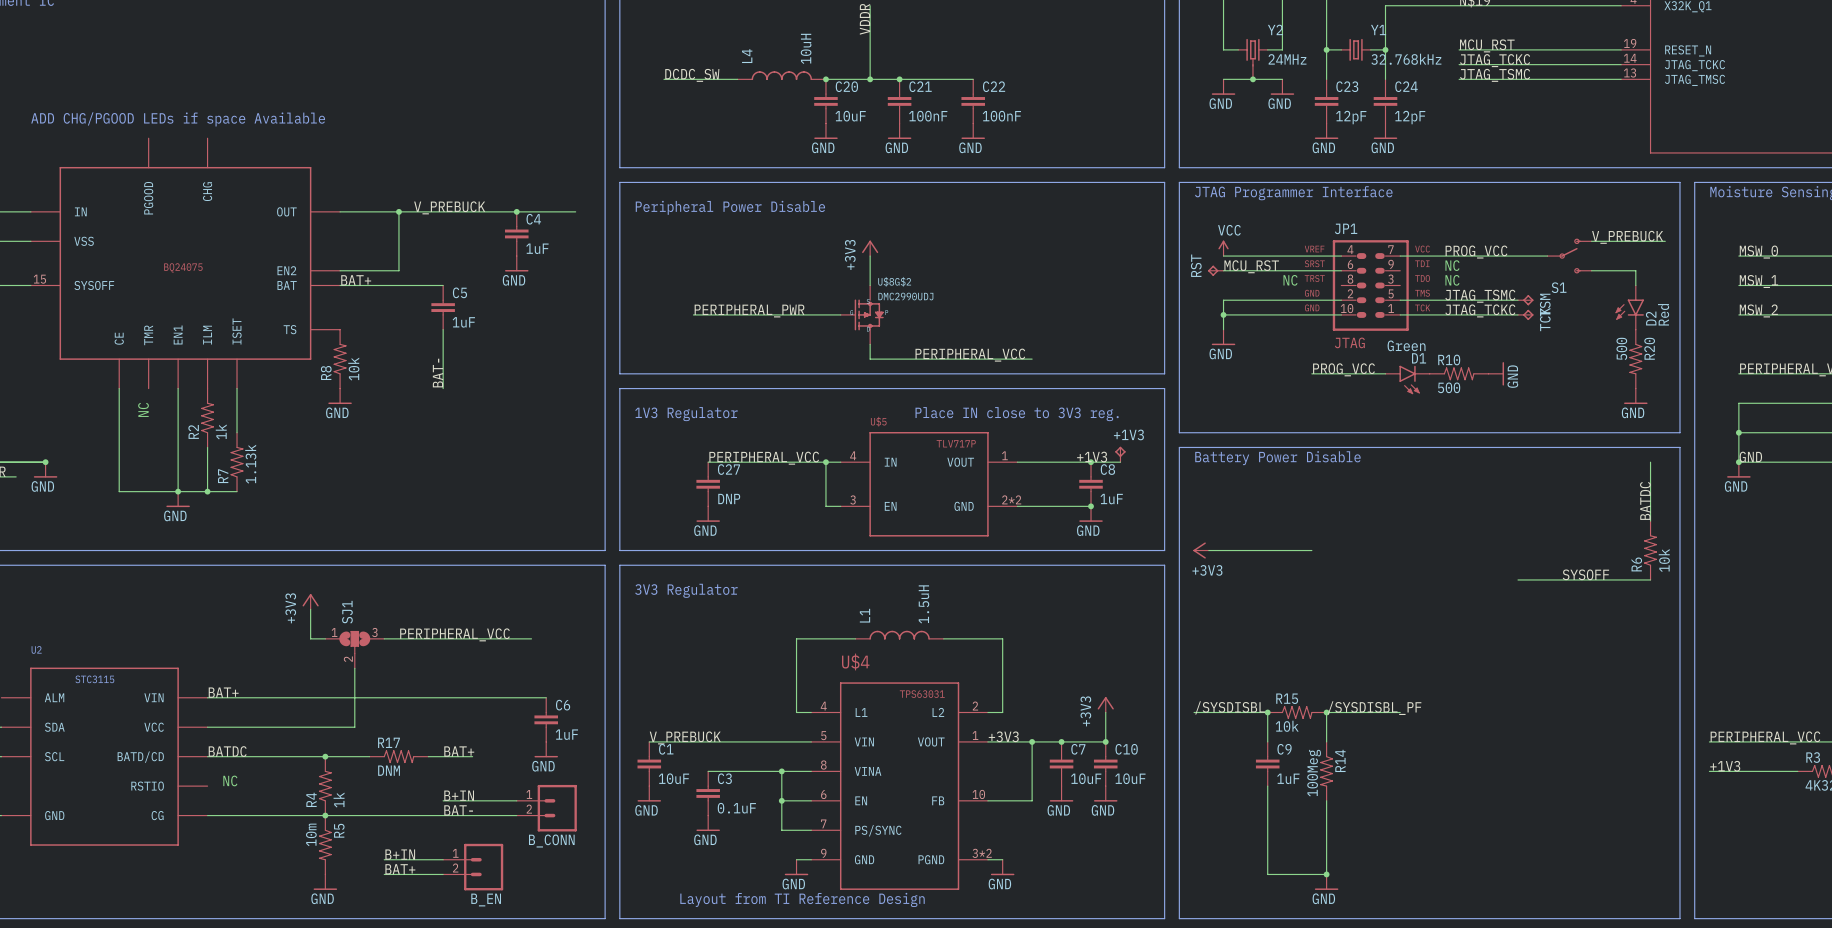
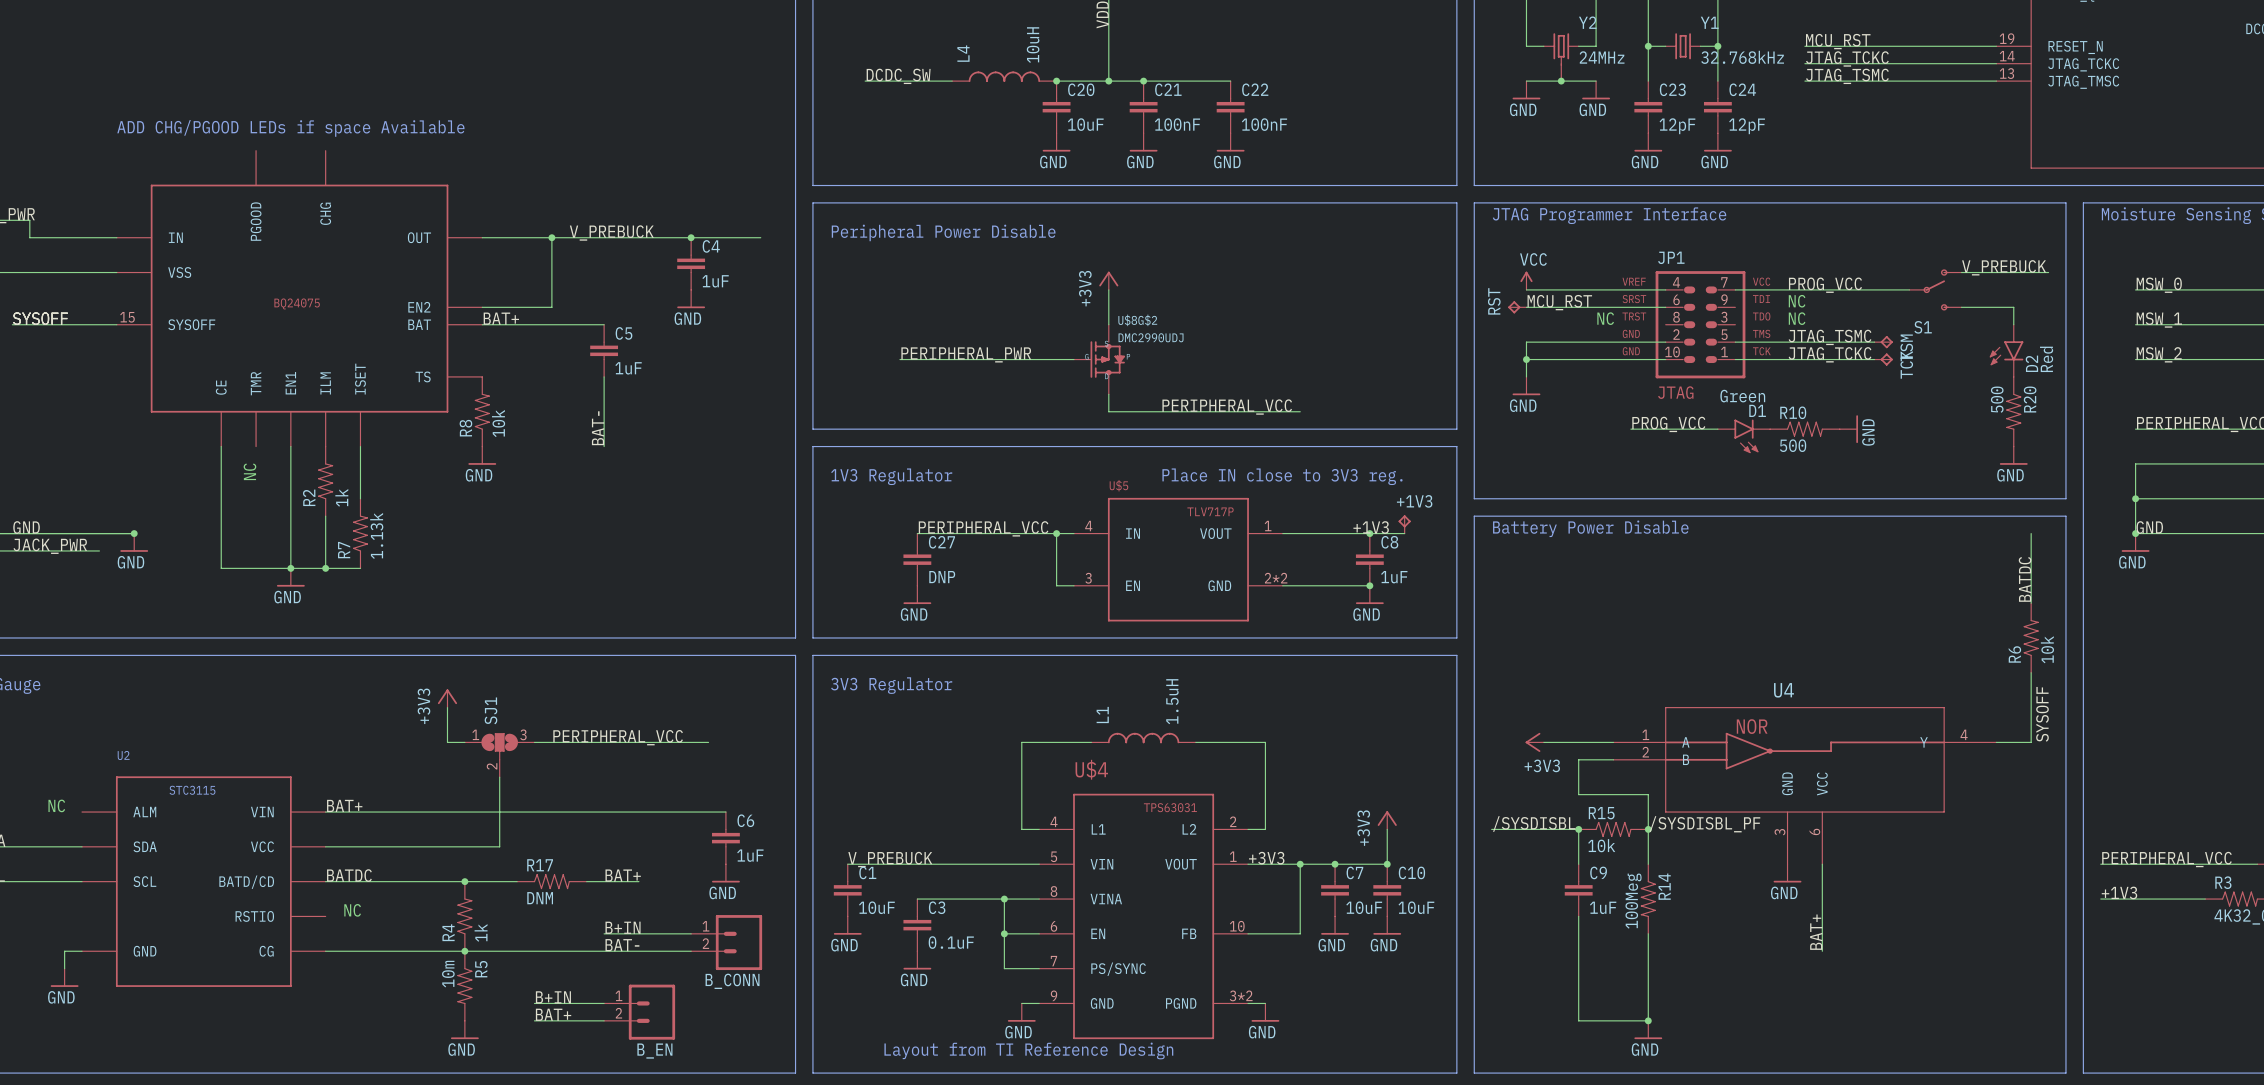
power symbol position: +3V3 (1201, 550) -> +3V3 (1534, 742)
wire: (1208, 550) (1311, 550) -> none
label rotation: 0° (1585, 574) -> 90° counterclockwise (2042, 714)
label position: SYSOFF (1585, 574) -> SYSOFF (2042, 714)
wire: (1518, 579) (1650, 579) -> (1996, 742) (2031, 742) (2031, 672)
wire: none -> (1543, 742) (1613, 742)
U4: none -> (1804, 785)
wire: (1326, 712) (1400, 712) -> (1648, 829) (1648, 794) (1578, 794) (1578, 759) (1613, 759)
wire: none -> (1822, 864) (1822, 951)
power symbol: none -> GND (1787, 873)
label: none -> BAT+ (1816, 932)

